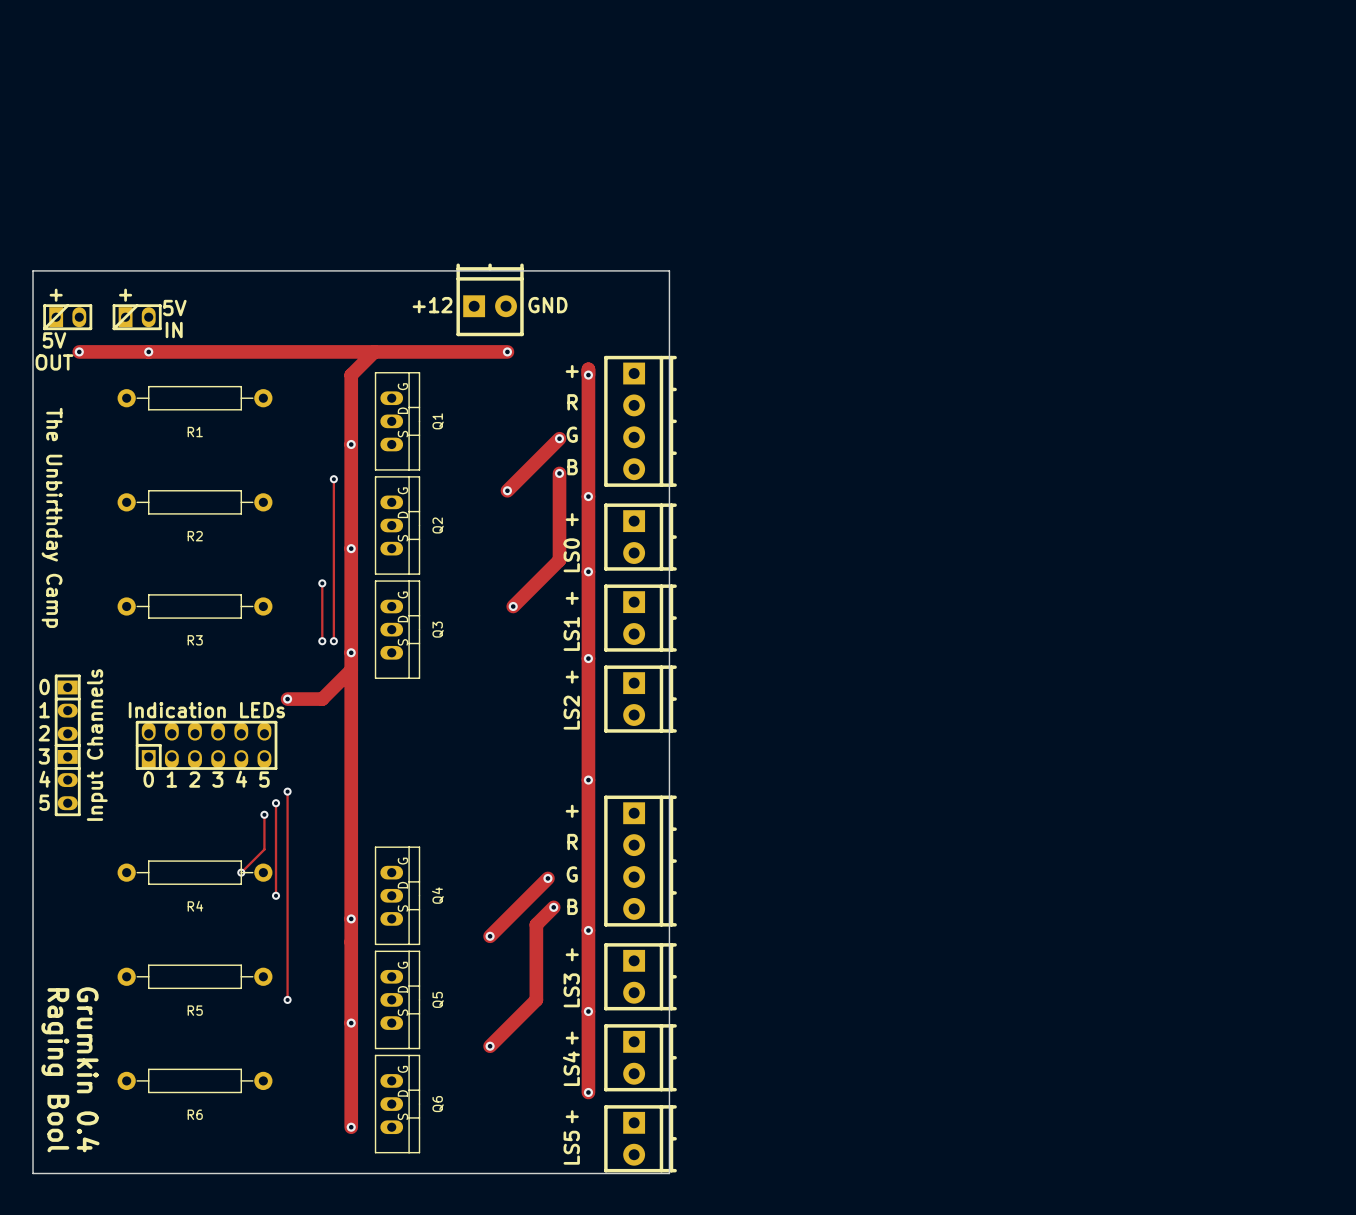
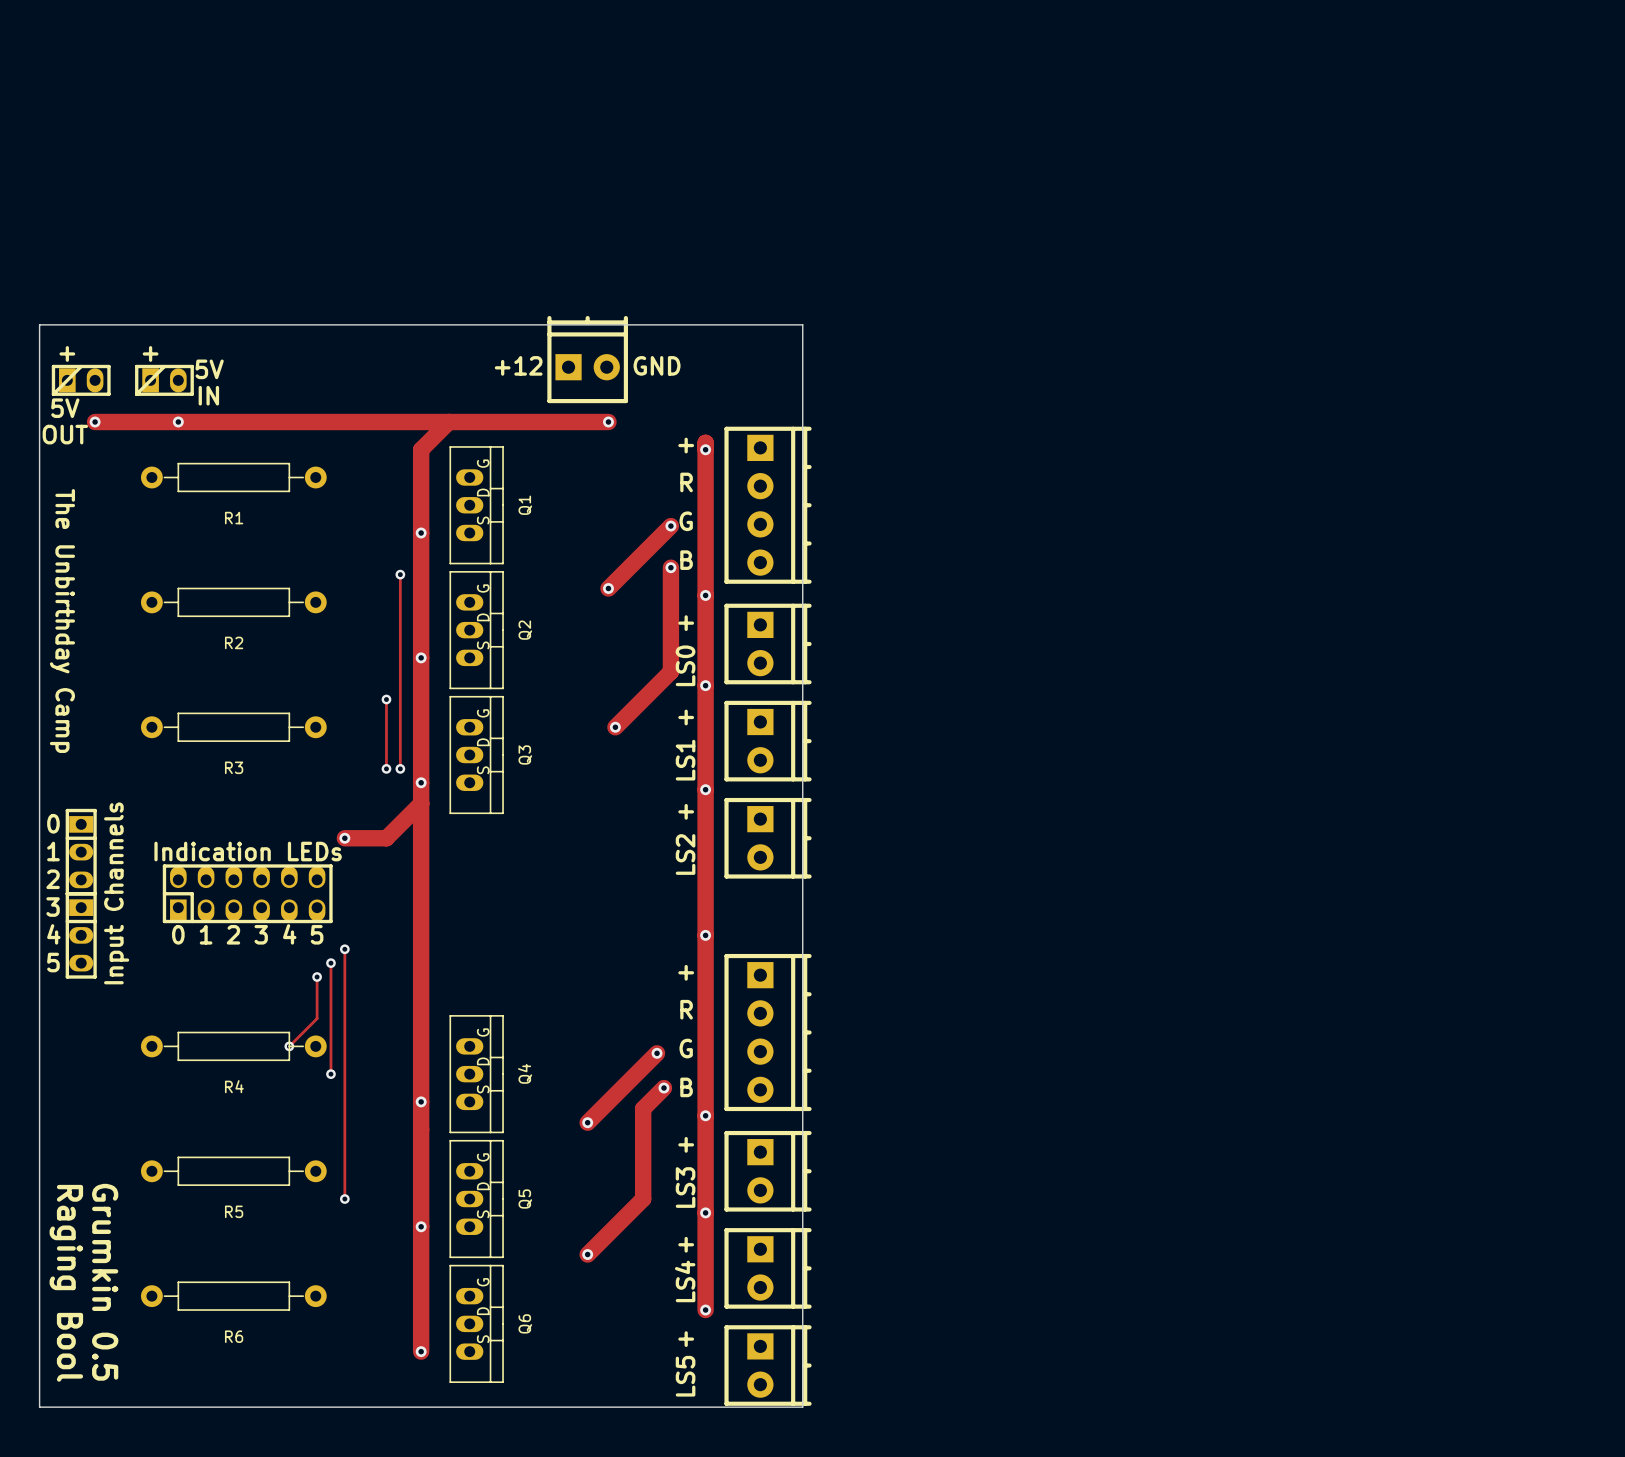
text: Grumkin 0.4 (88, 1069) -> Grumkin 0.5 (105, 1282)

